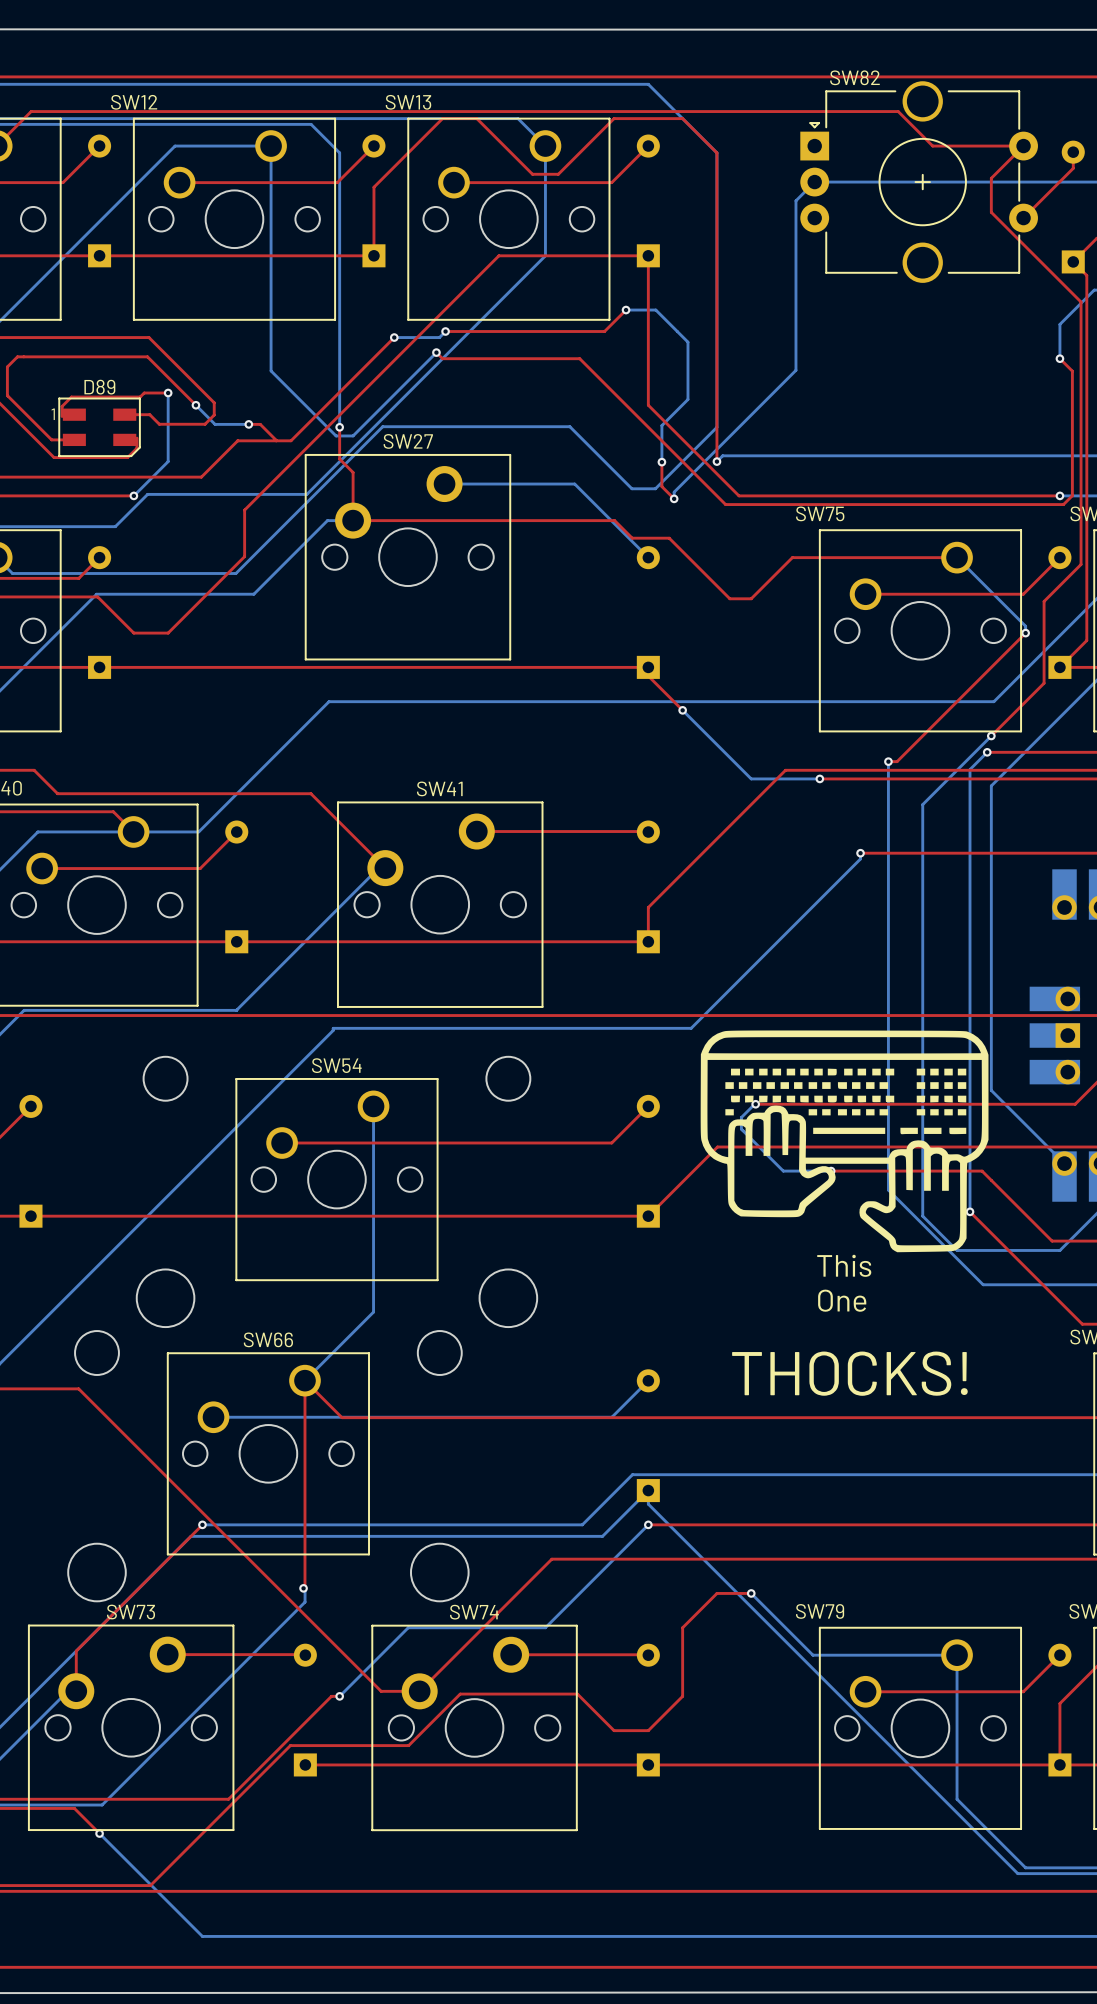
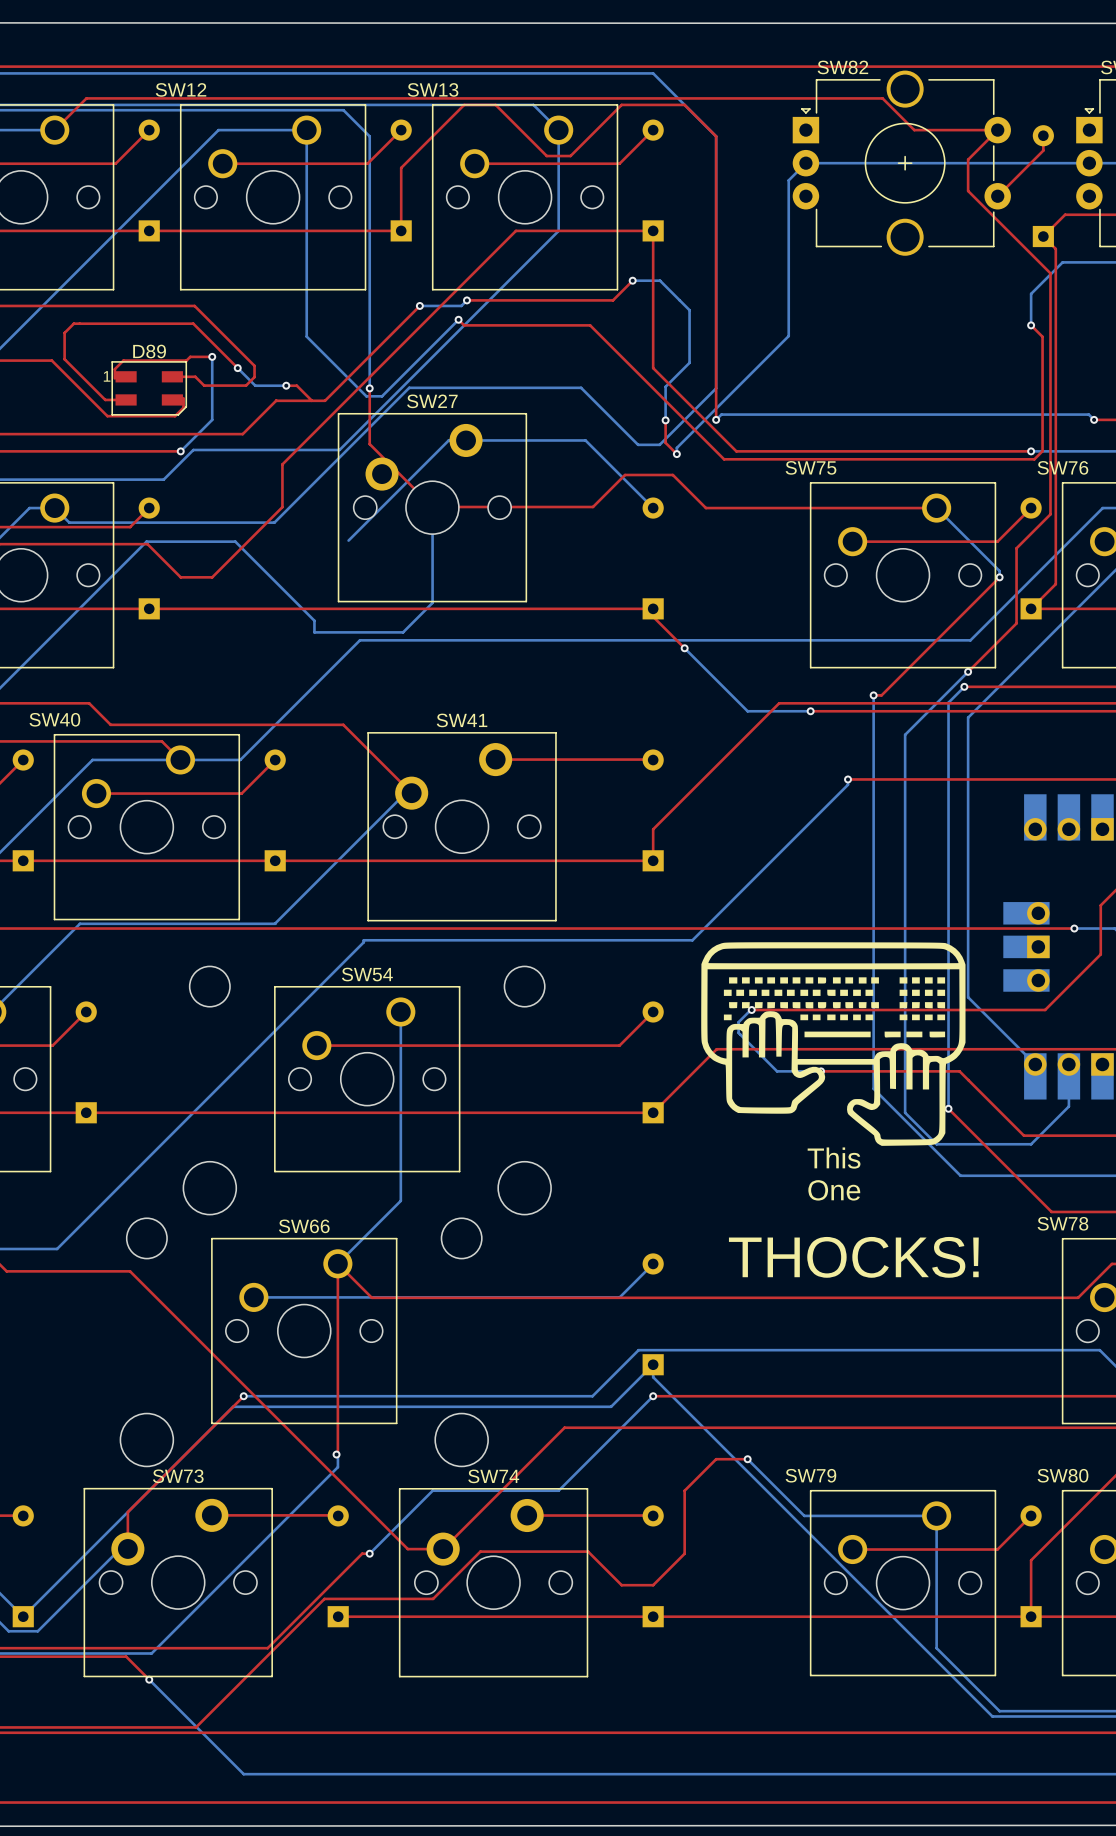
top track: (339, 459) (353, 472) (353, 520) (614, 520) (632, 538) (669, 538) (729, 598) (751, 598) (792, 557) -> (369, 417) (369, 444) (432, 507) (593, 507) (625, 474) (672, 474) (705, 508) (785, 508)
bottom track: none -> (466, 440) (448, 440) (348, 540)
bottom track: (353, 520) (327, 520) (253, 594) (193, 594) -> (432, 507) (432, 602) (403, 632) (314, 632) (314, 620) (235, 541)

